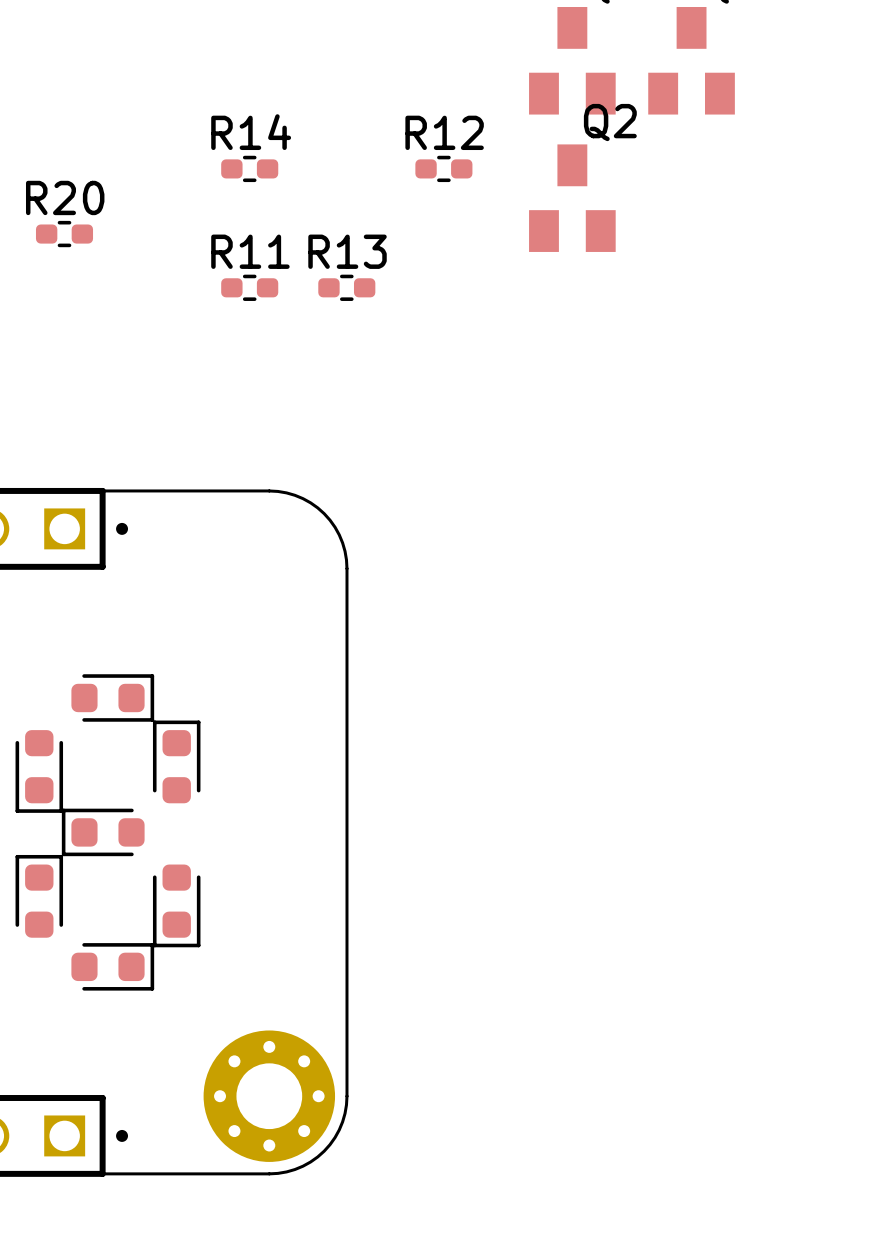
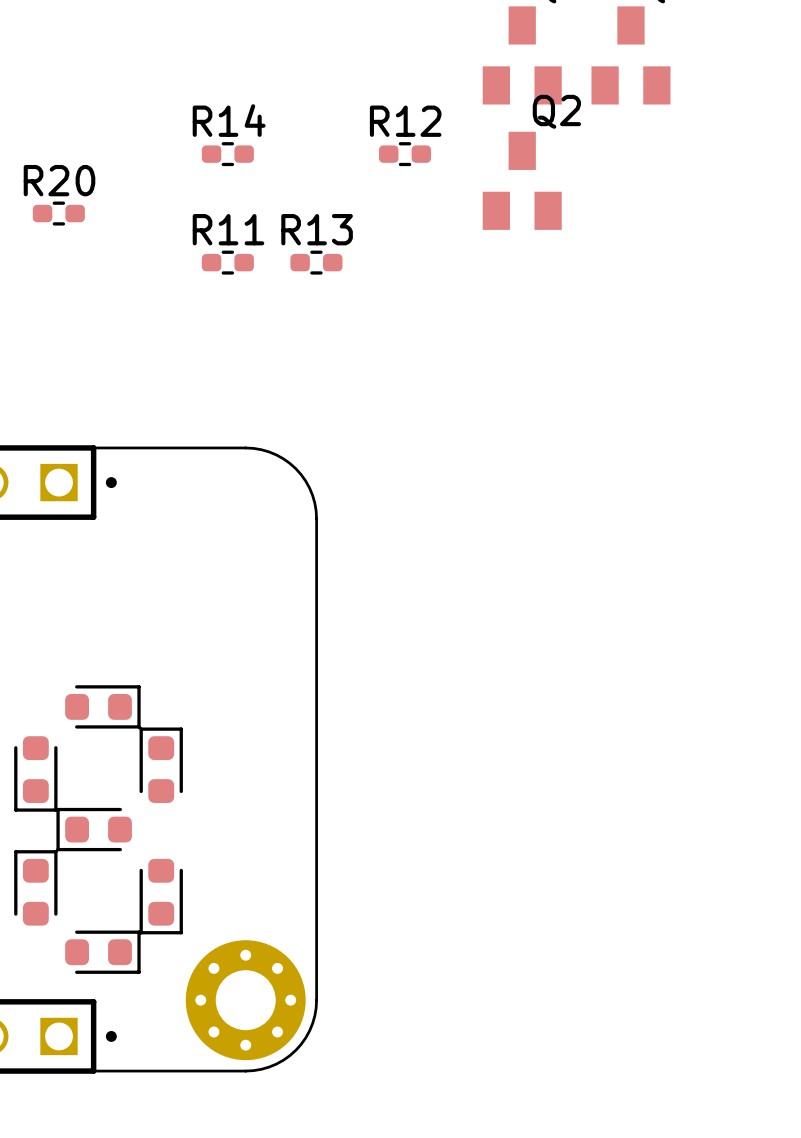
part: (112, 697) -> none
part: (176, 761) -> none
part: (39, 771) -> none
part: none -> (102, 706)
part: (103, 832) -> none
part: none -> (161, 765)
part: none -> (35, 773)
part: (39, 896) -> none
part: (176, 905) -> none
part: none -> (94, 829)
part: (112, 966) -> none
part: none -> (35, 887)
part: none -> (161, 896)
part: none -> (102, 952)

